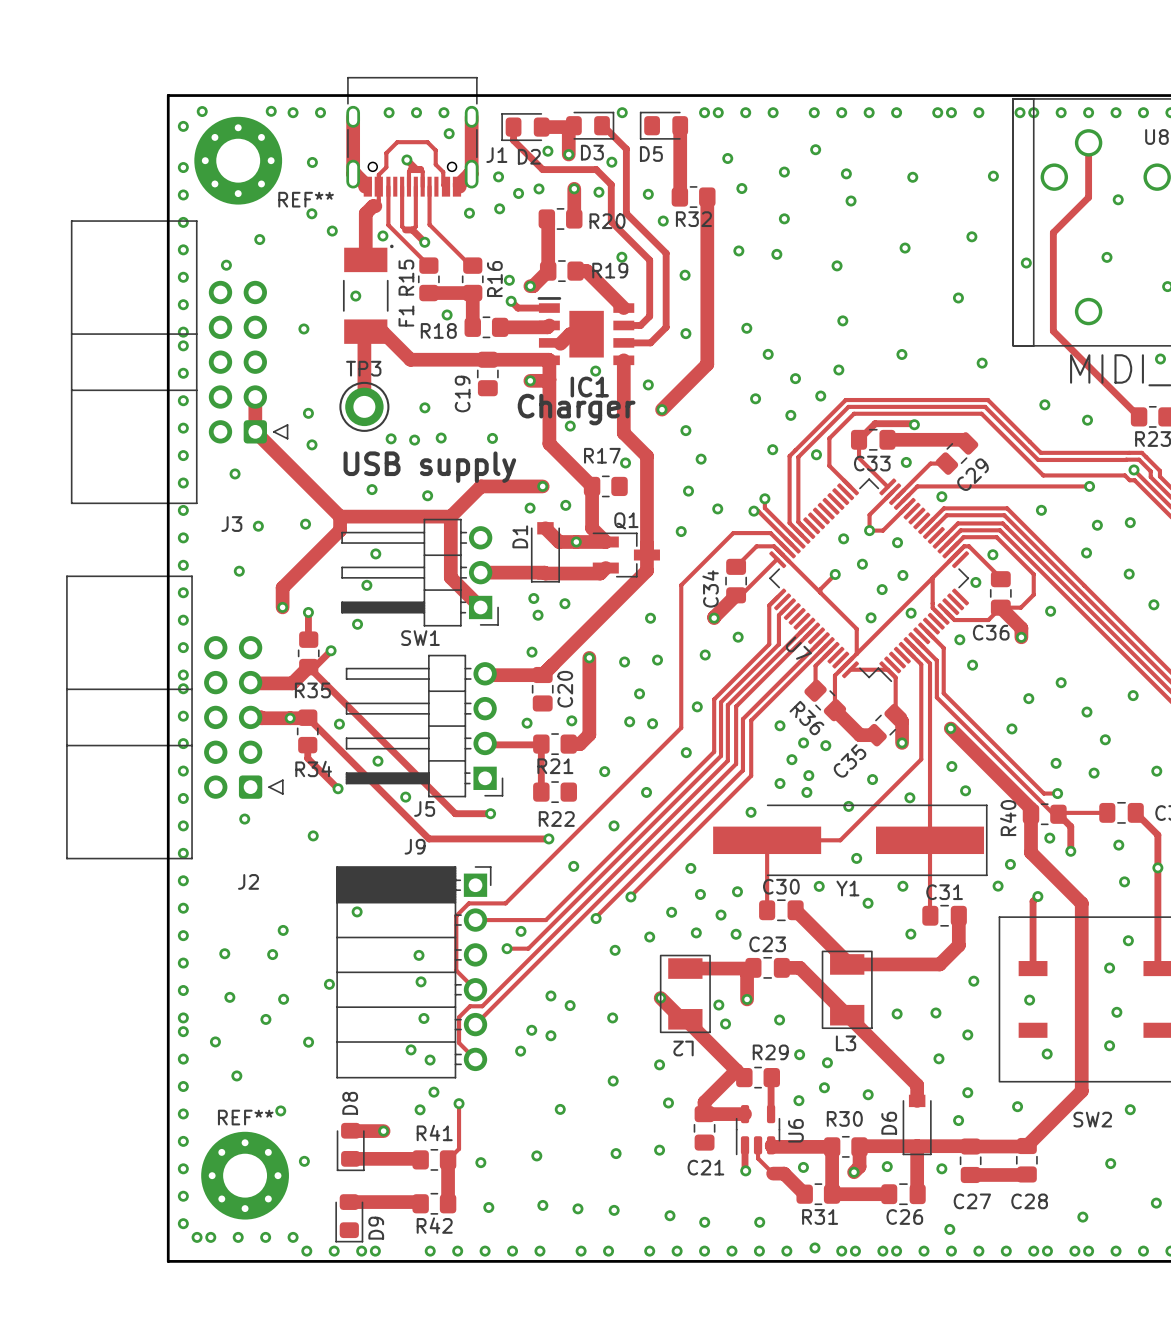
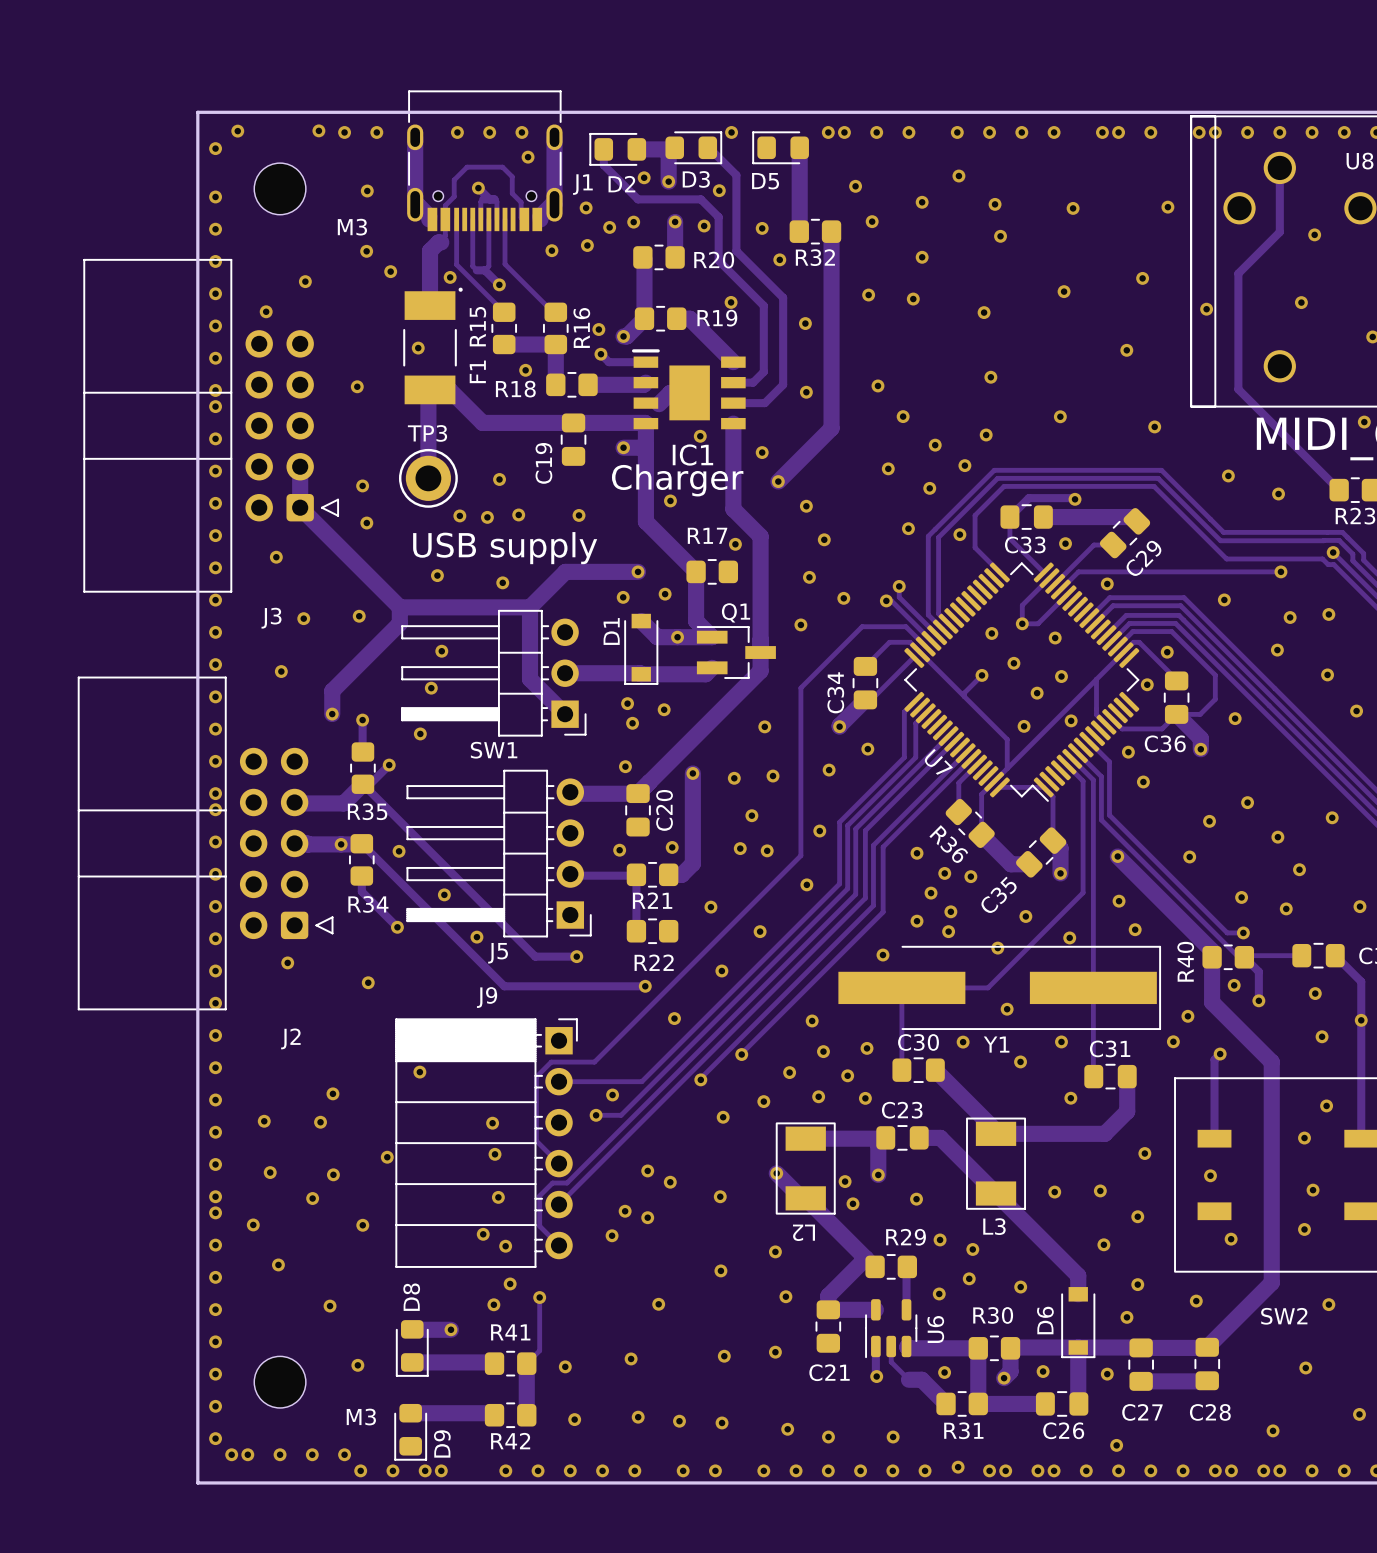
REF**: (238, 160) -> none
M3: none -> (280, 188)
M3: none -> (280, 1382)
REF**: (245, 1175) -> none

